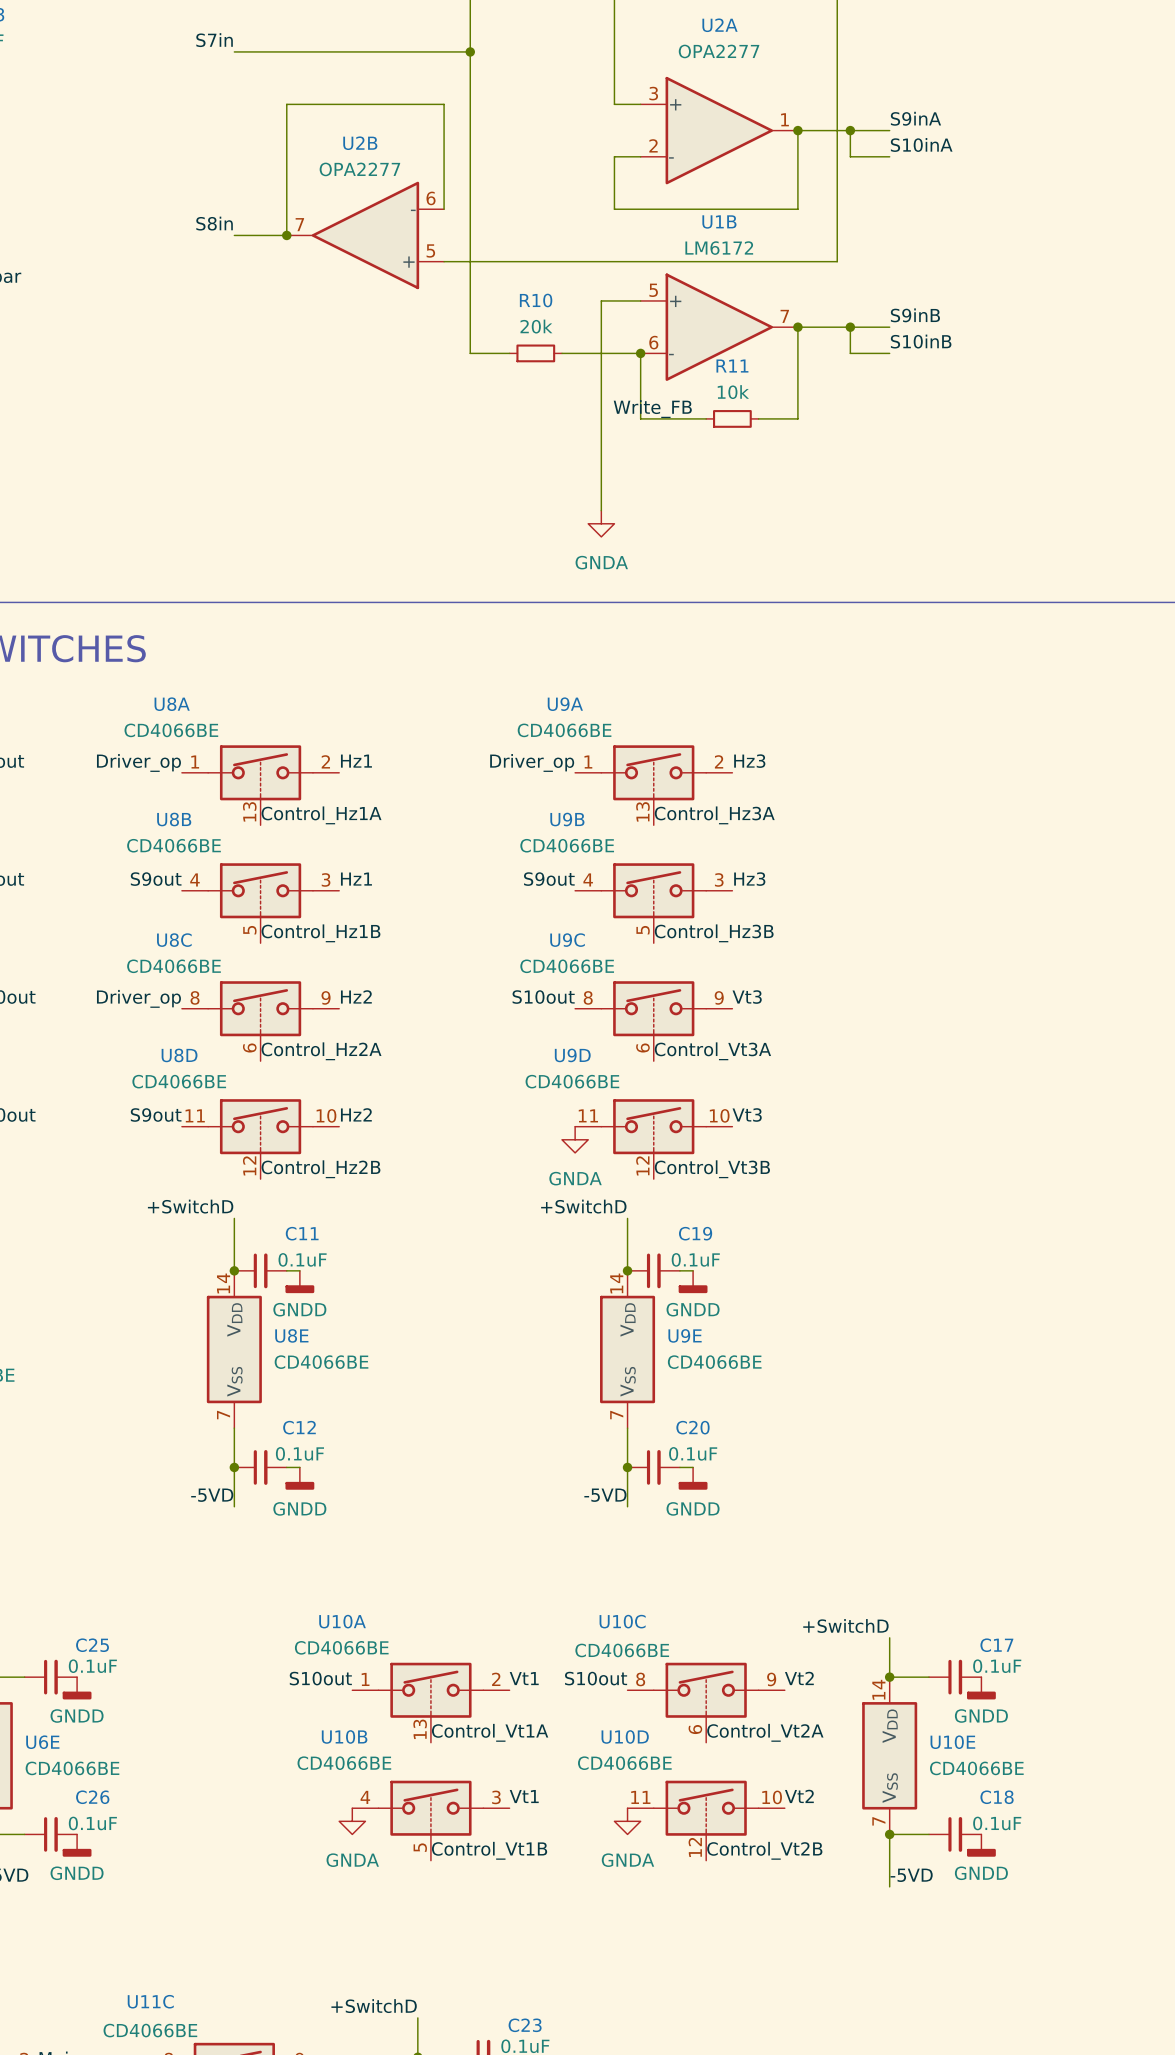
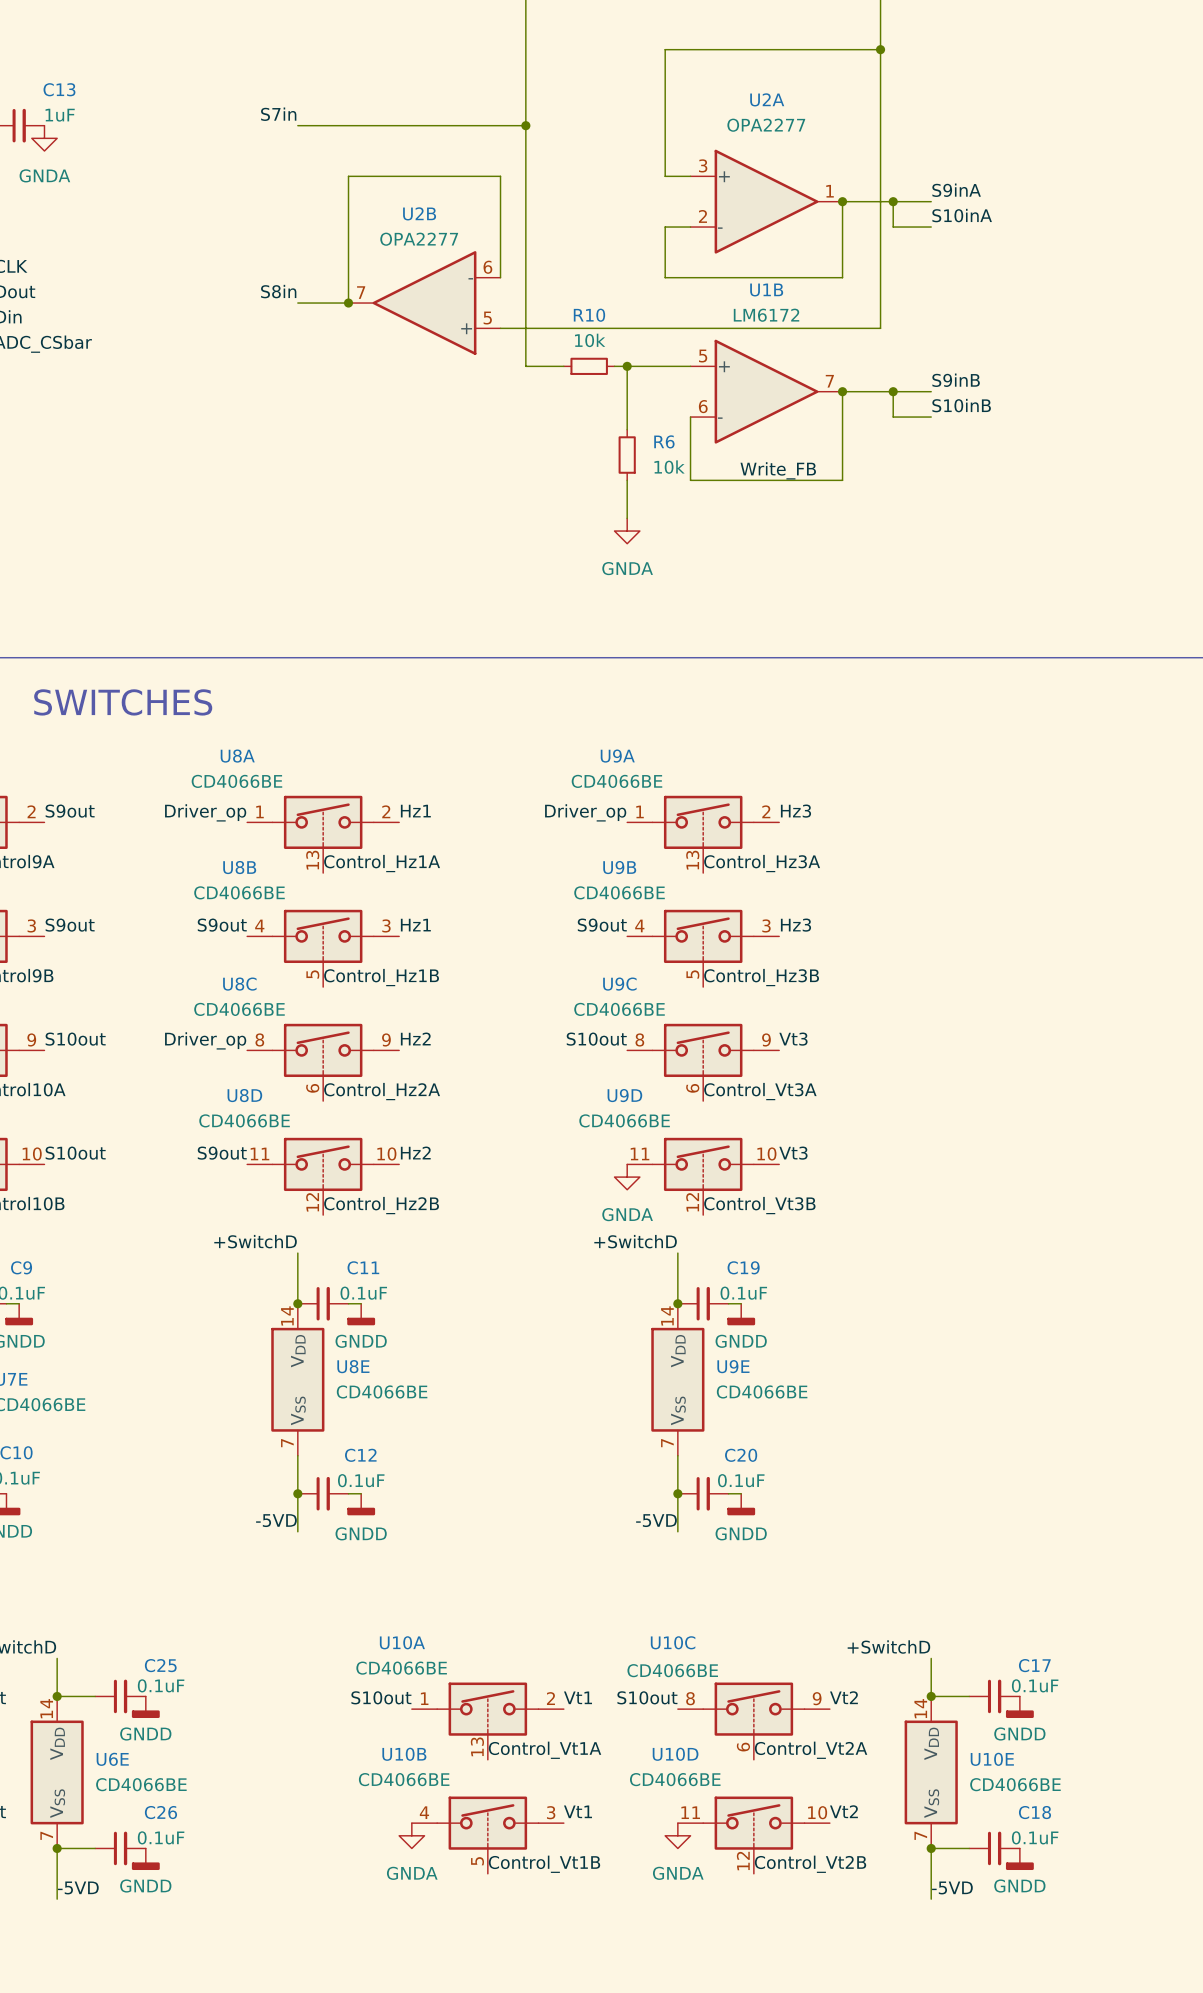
wire: (470, 300) (470, 353) (509, 353) -> (525, 366) (563, 366)
wire: none -> (627, 366) (627, 429)
junction: none -> (627, 366)
wire: (601, 300) (601, 510) -> (652, 366) (614, 366)
R10 value: 20k (536, 326) -> 10k (590, 340)
R10 position: (535, 353) -> (589, 366)
wire: (562, 353) (640, 353) -> none
junction: (640, 353) -> none
R6: none -> 10k (627, 455)
label position: Write_FB (652, 409) -> Write_FB (778, 470)
wire: none -> (627, 480) (627, 518)
wire: none -> (753, 480) (804, 480)
R11: 10k (732, 418) -> none
power symbol position: GNDA (601, 523) -> GNDA (627, 531)

